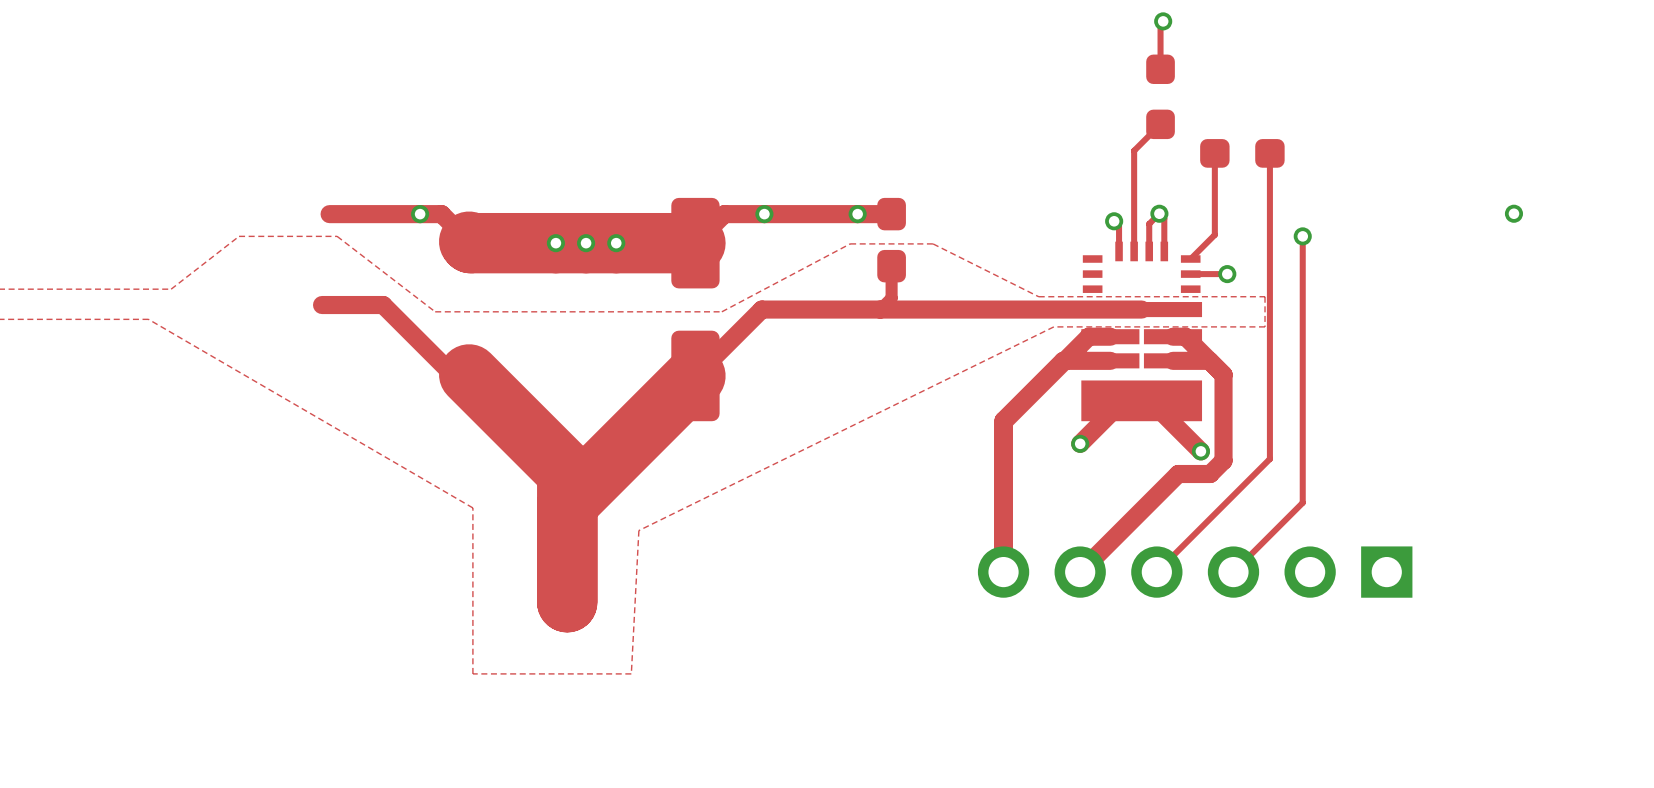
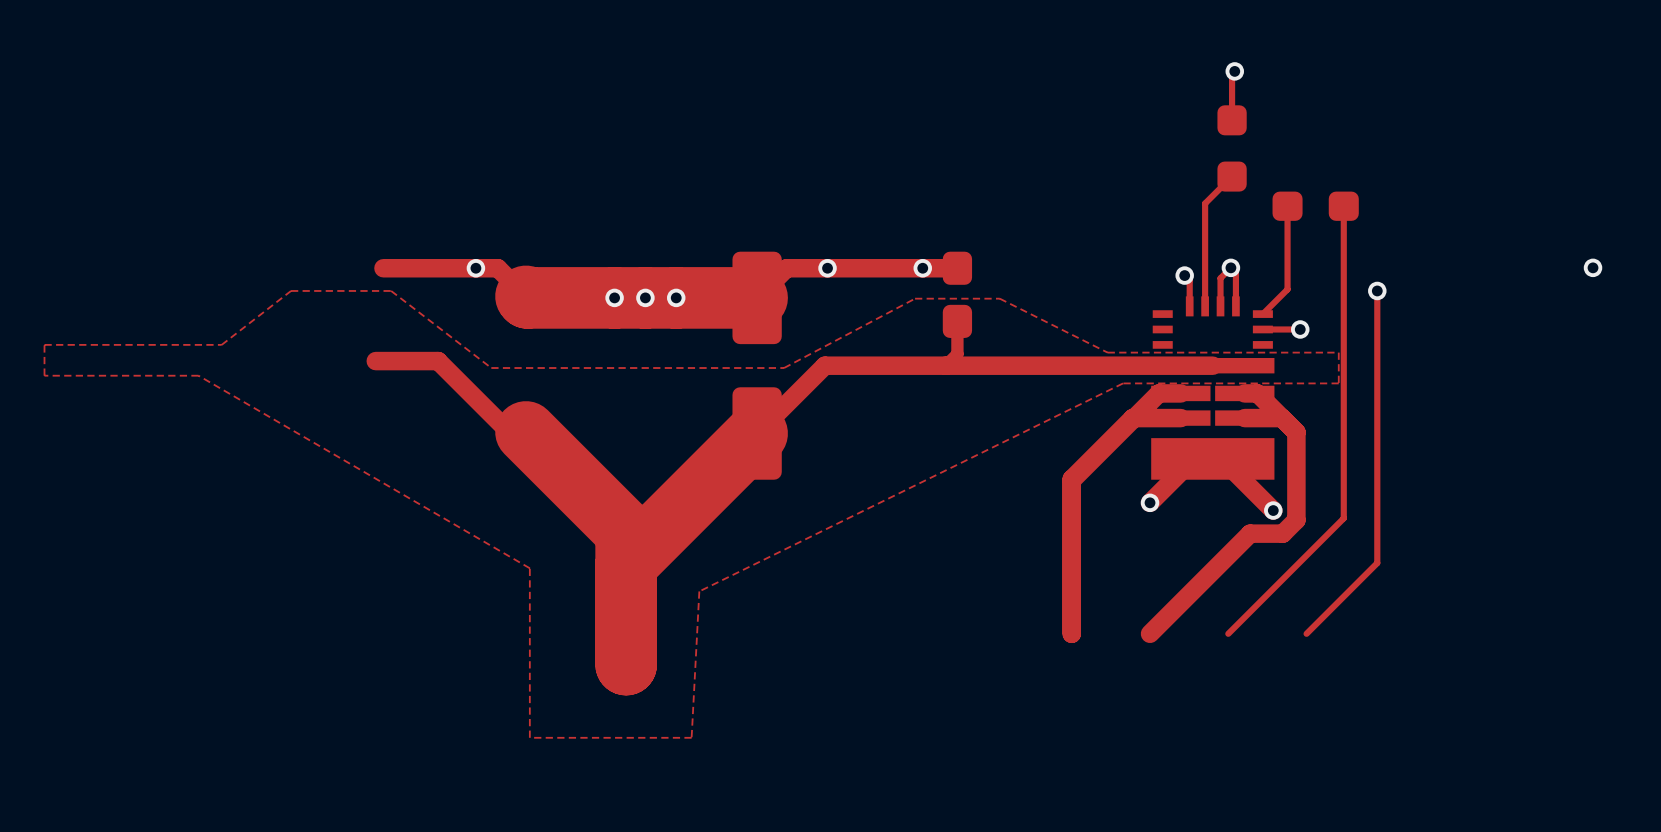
part: (1195, 572) -> none

